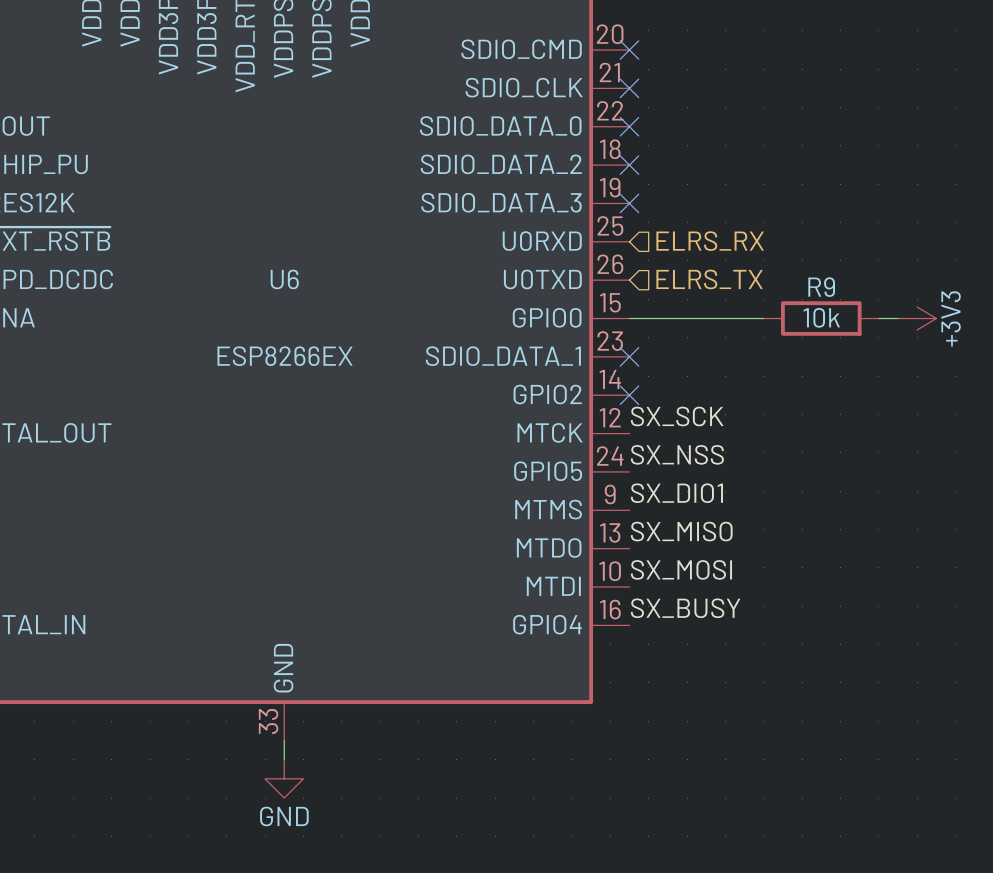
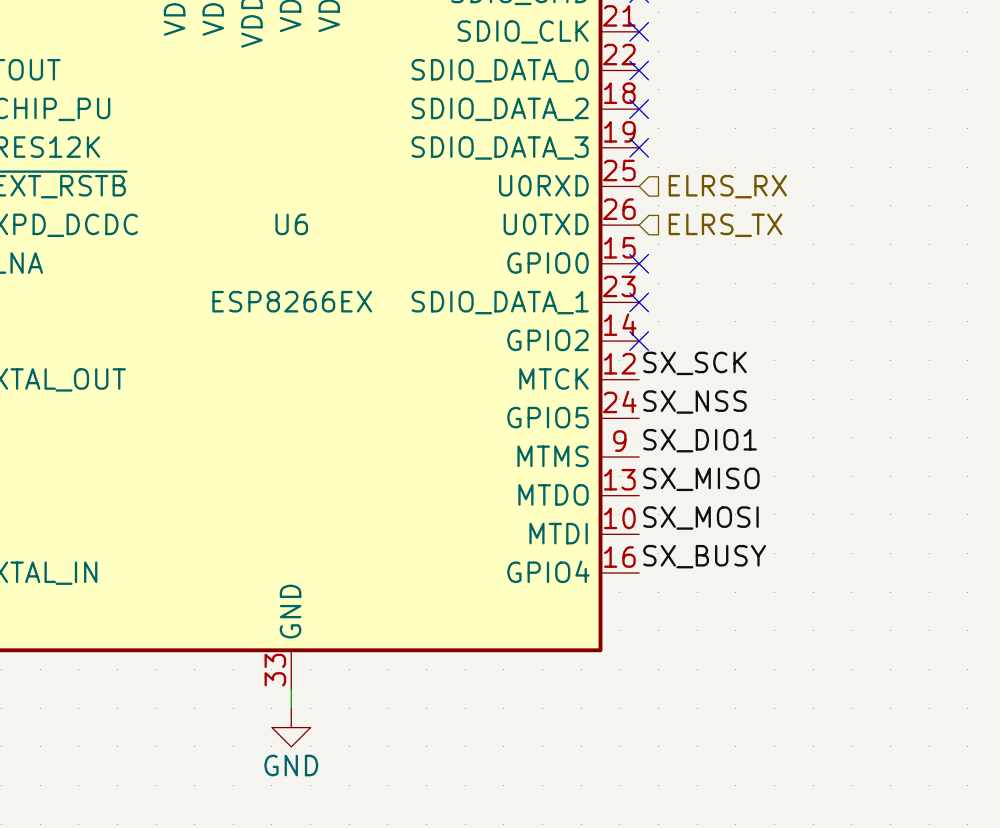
wire: (629, 318) (763, 318) -> none
no-connect mark: none -> (639, 263)
R9: 10k (821, 318) -> none
wire: (878, 318) (897, 318) -> none
power symbol: +3V3 (917, 318) -> none

